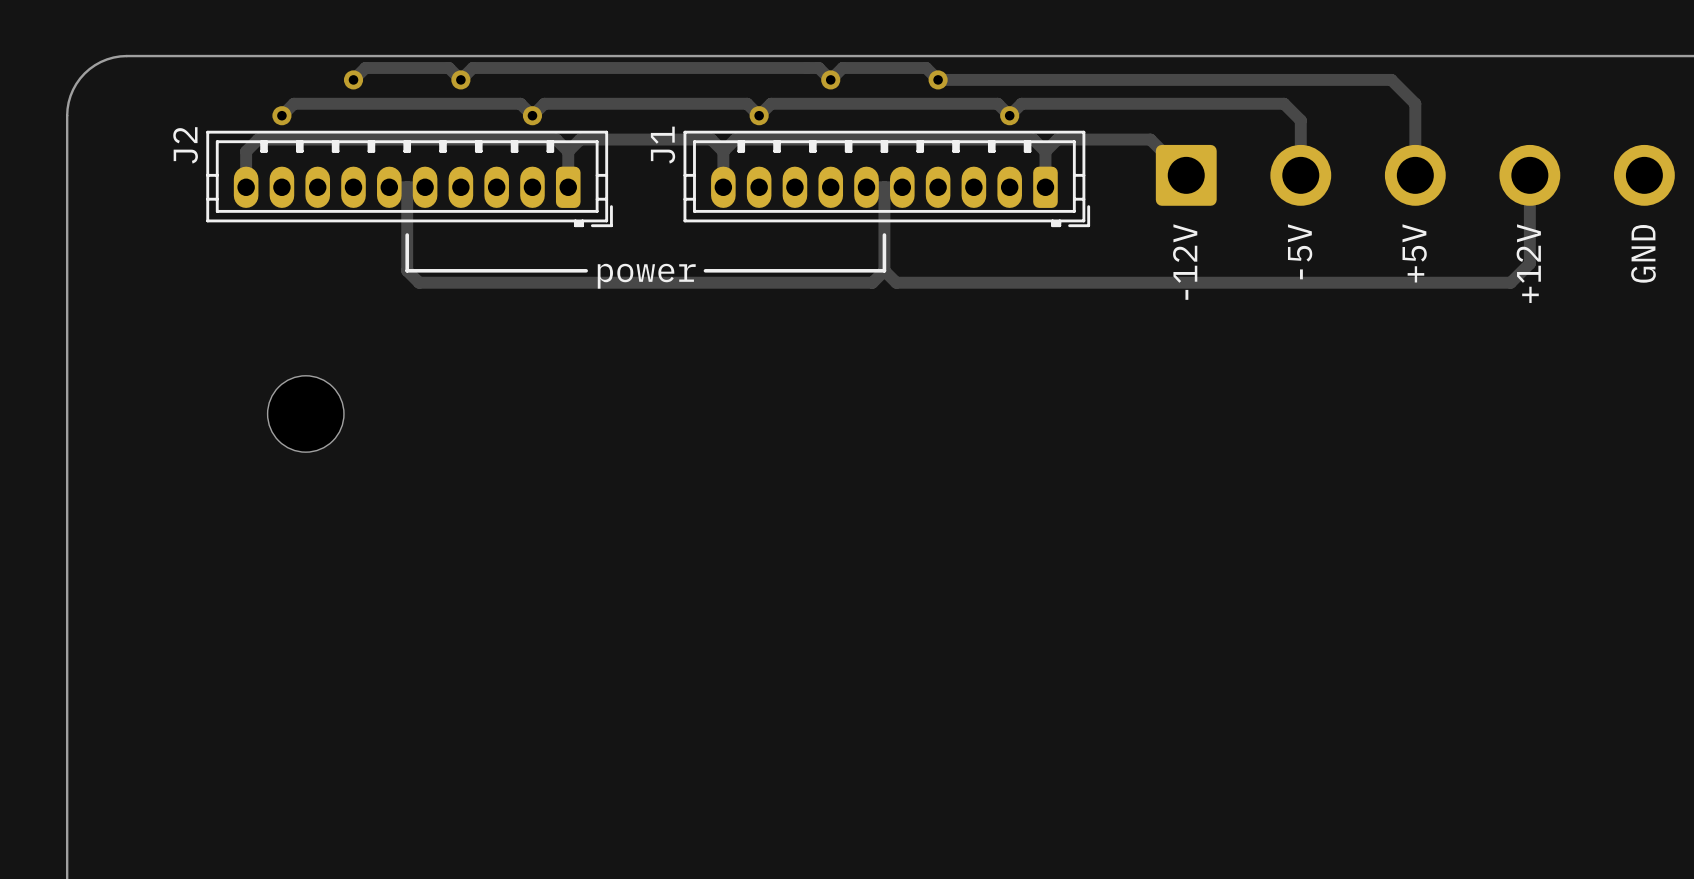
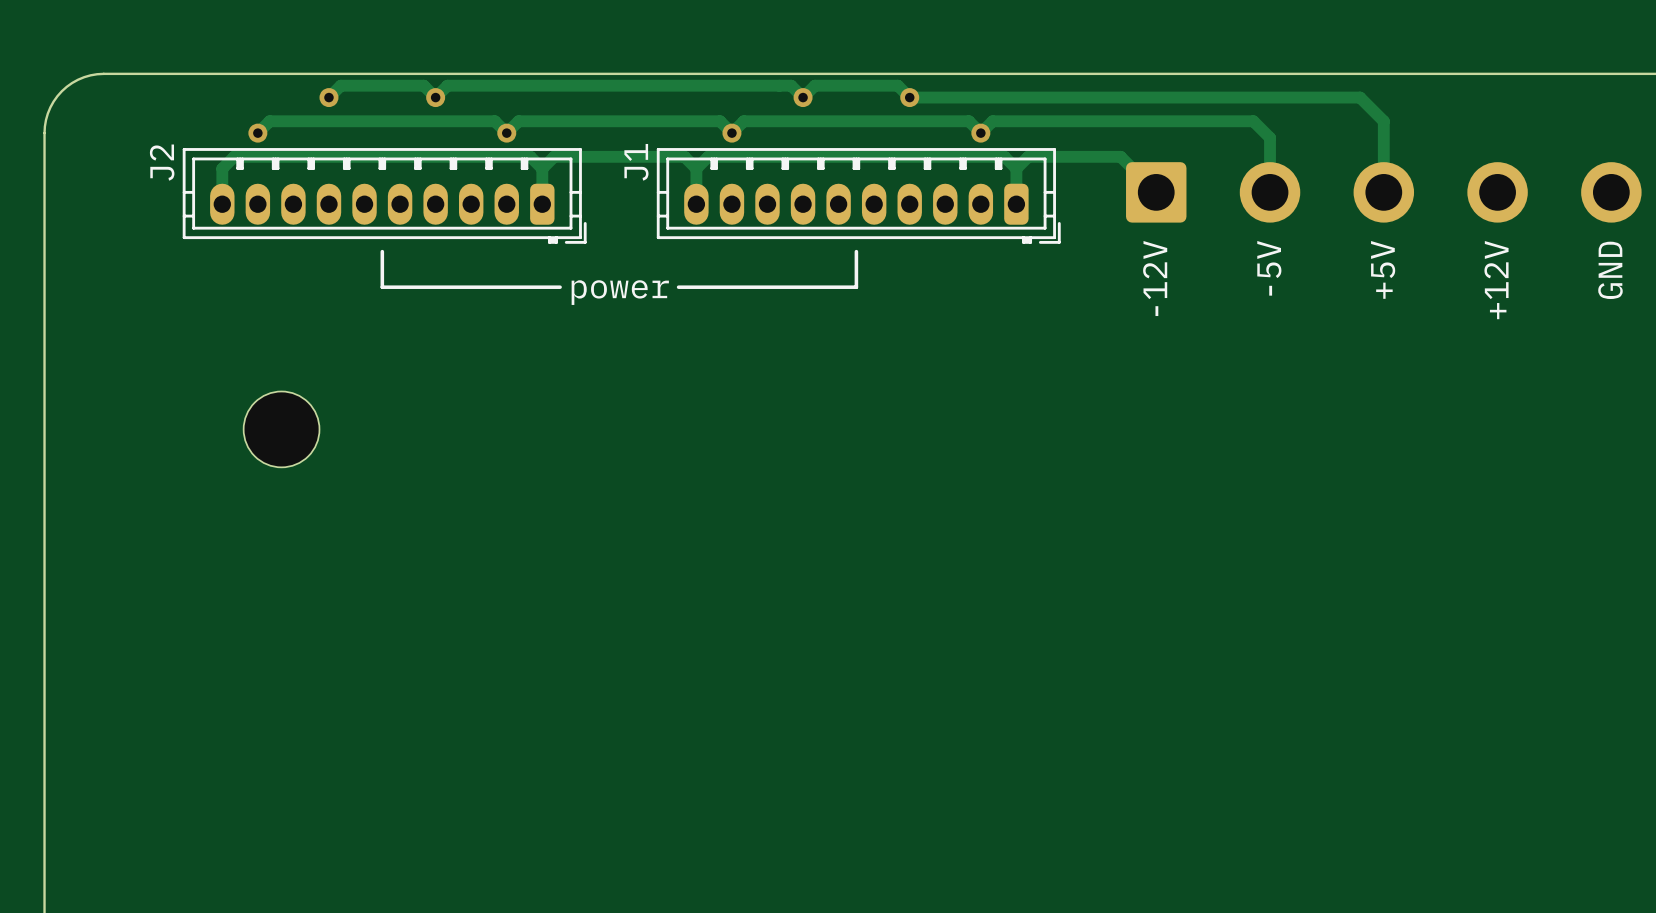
track: (1529, 175) (1529, 263) (1510, 282) (896, 282) (884, 270) -> none
track: (407, 187) (407, 270) (419, 282) (872, 282) (884, 270) -> none
track: (884, 187) (884, 270) -> none

